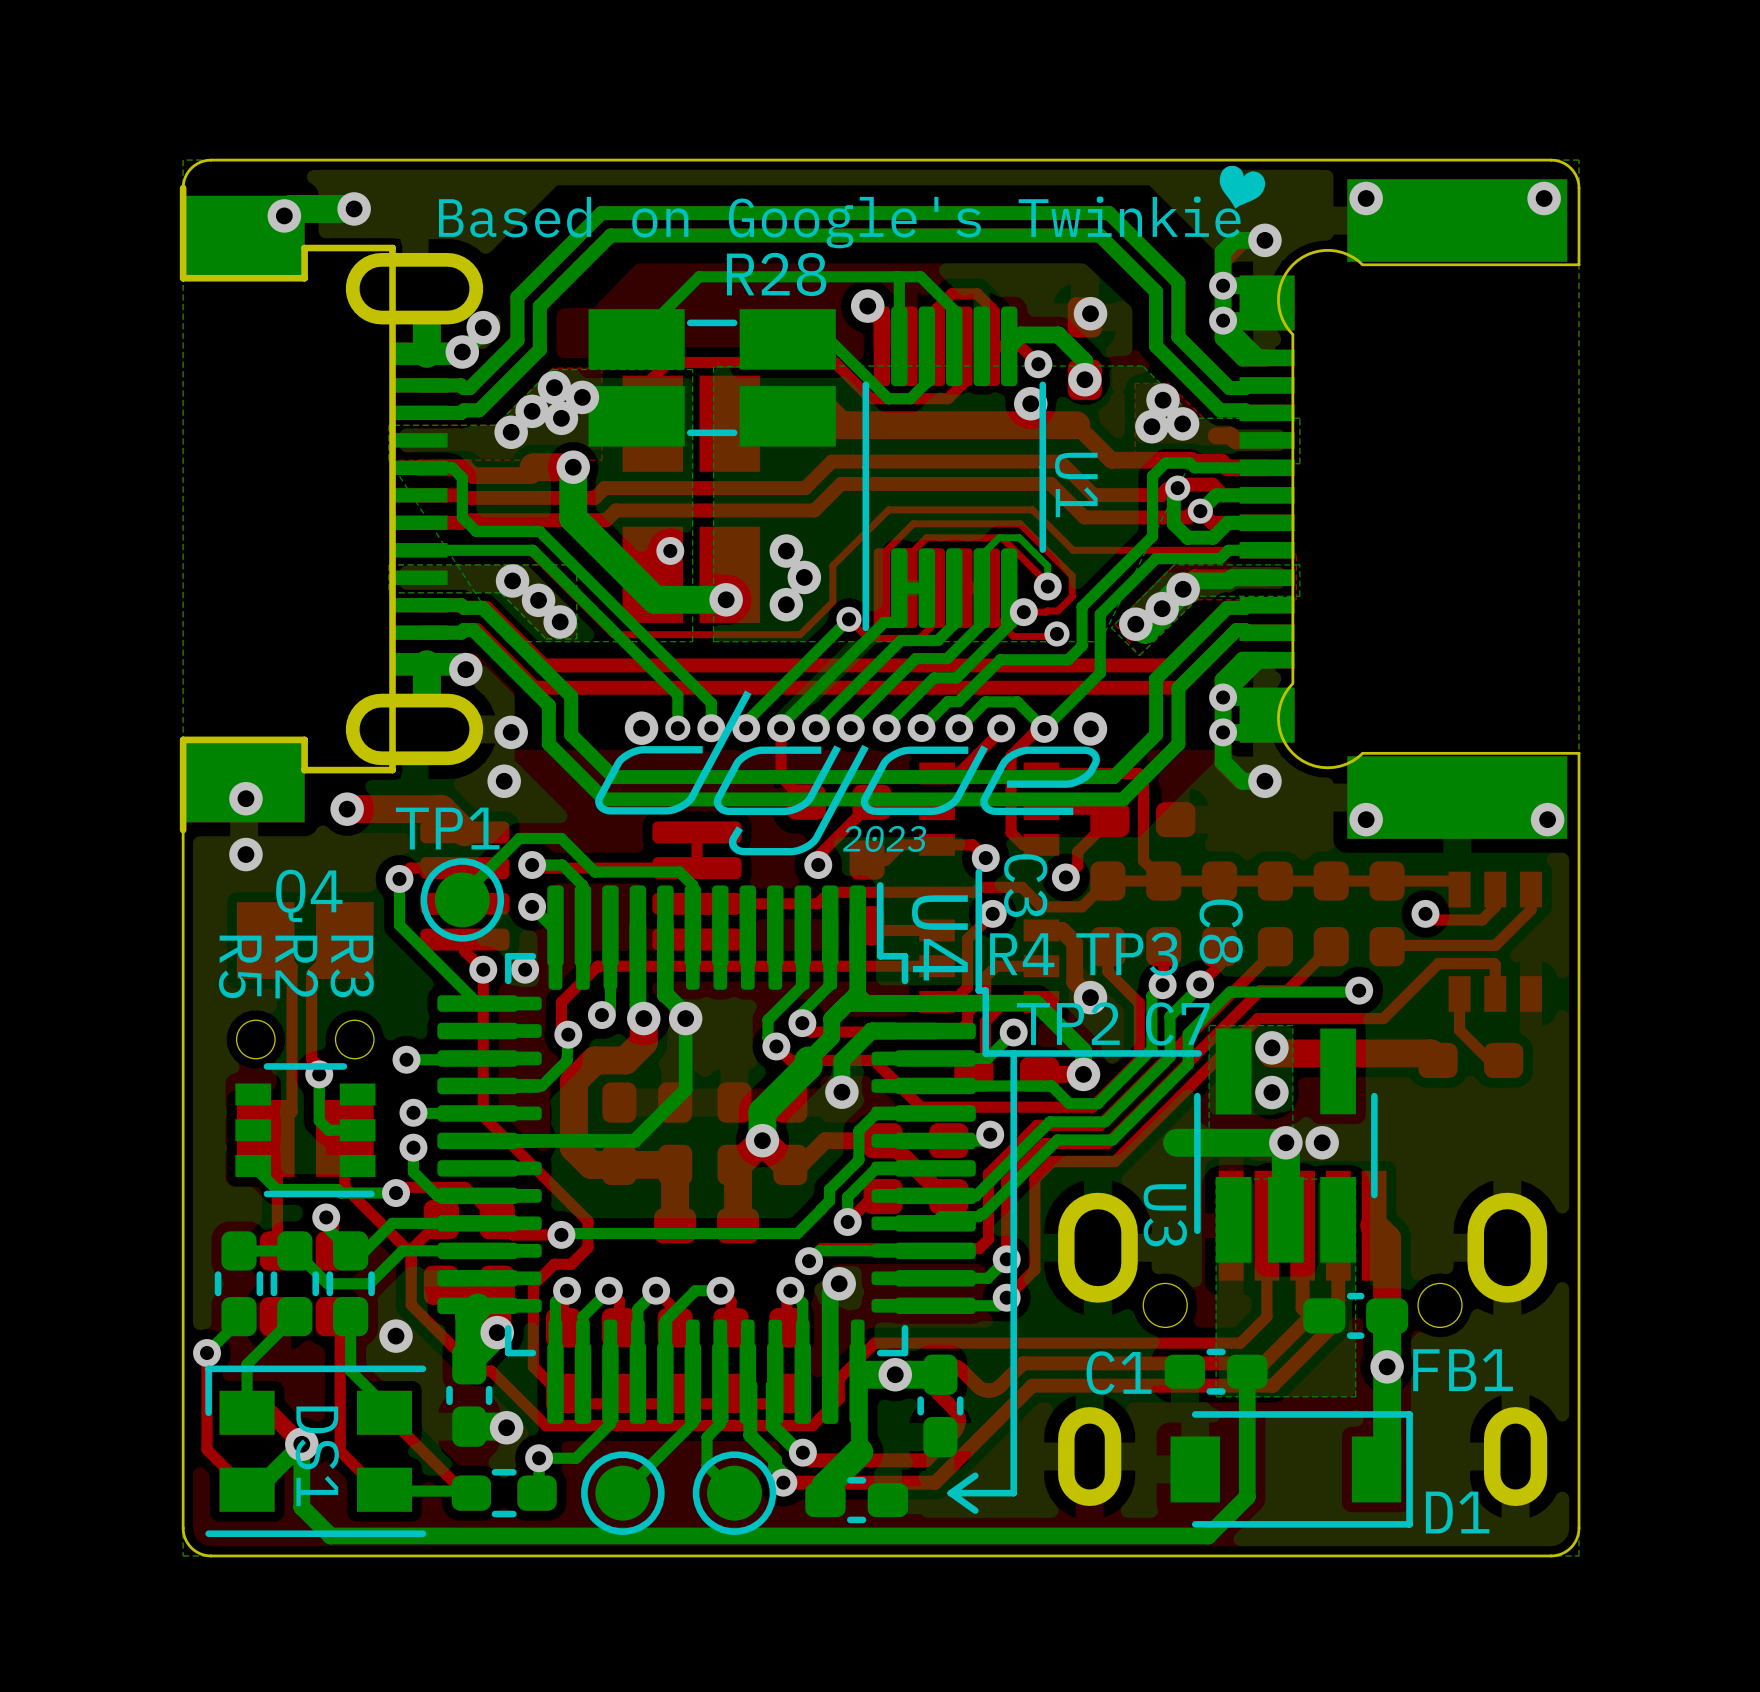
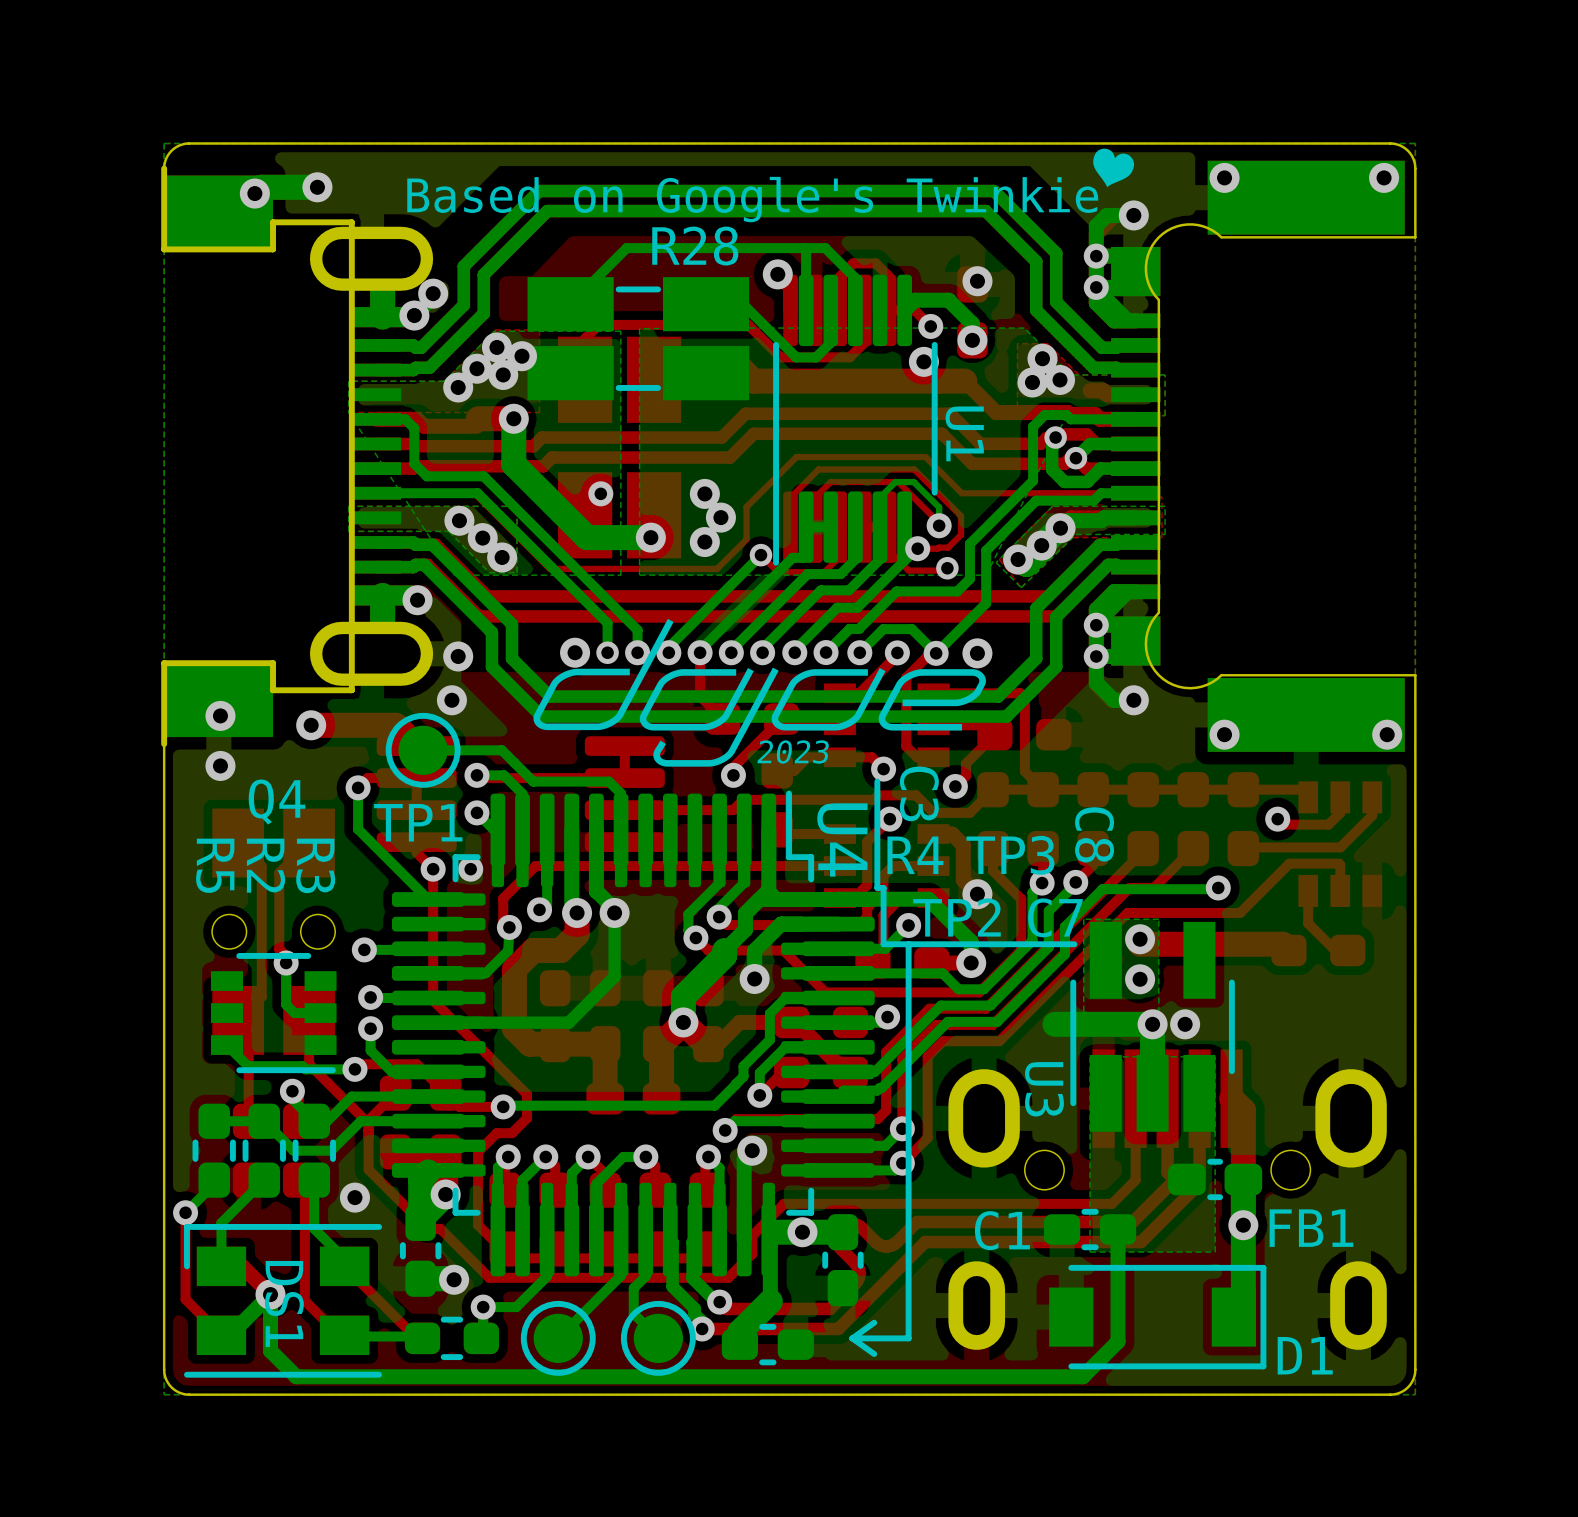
TP1 name position: TP1 (447, 828) -> TP1 (418, 822)
bottom track: (561, 838) (519, 838) (462, 895) -> (503, 751) (423, 750)
TP1 position: (462, 899) -> (423, 750)

